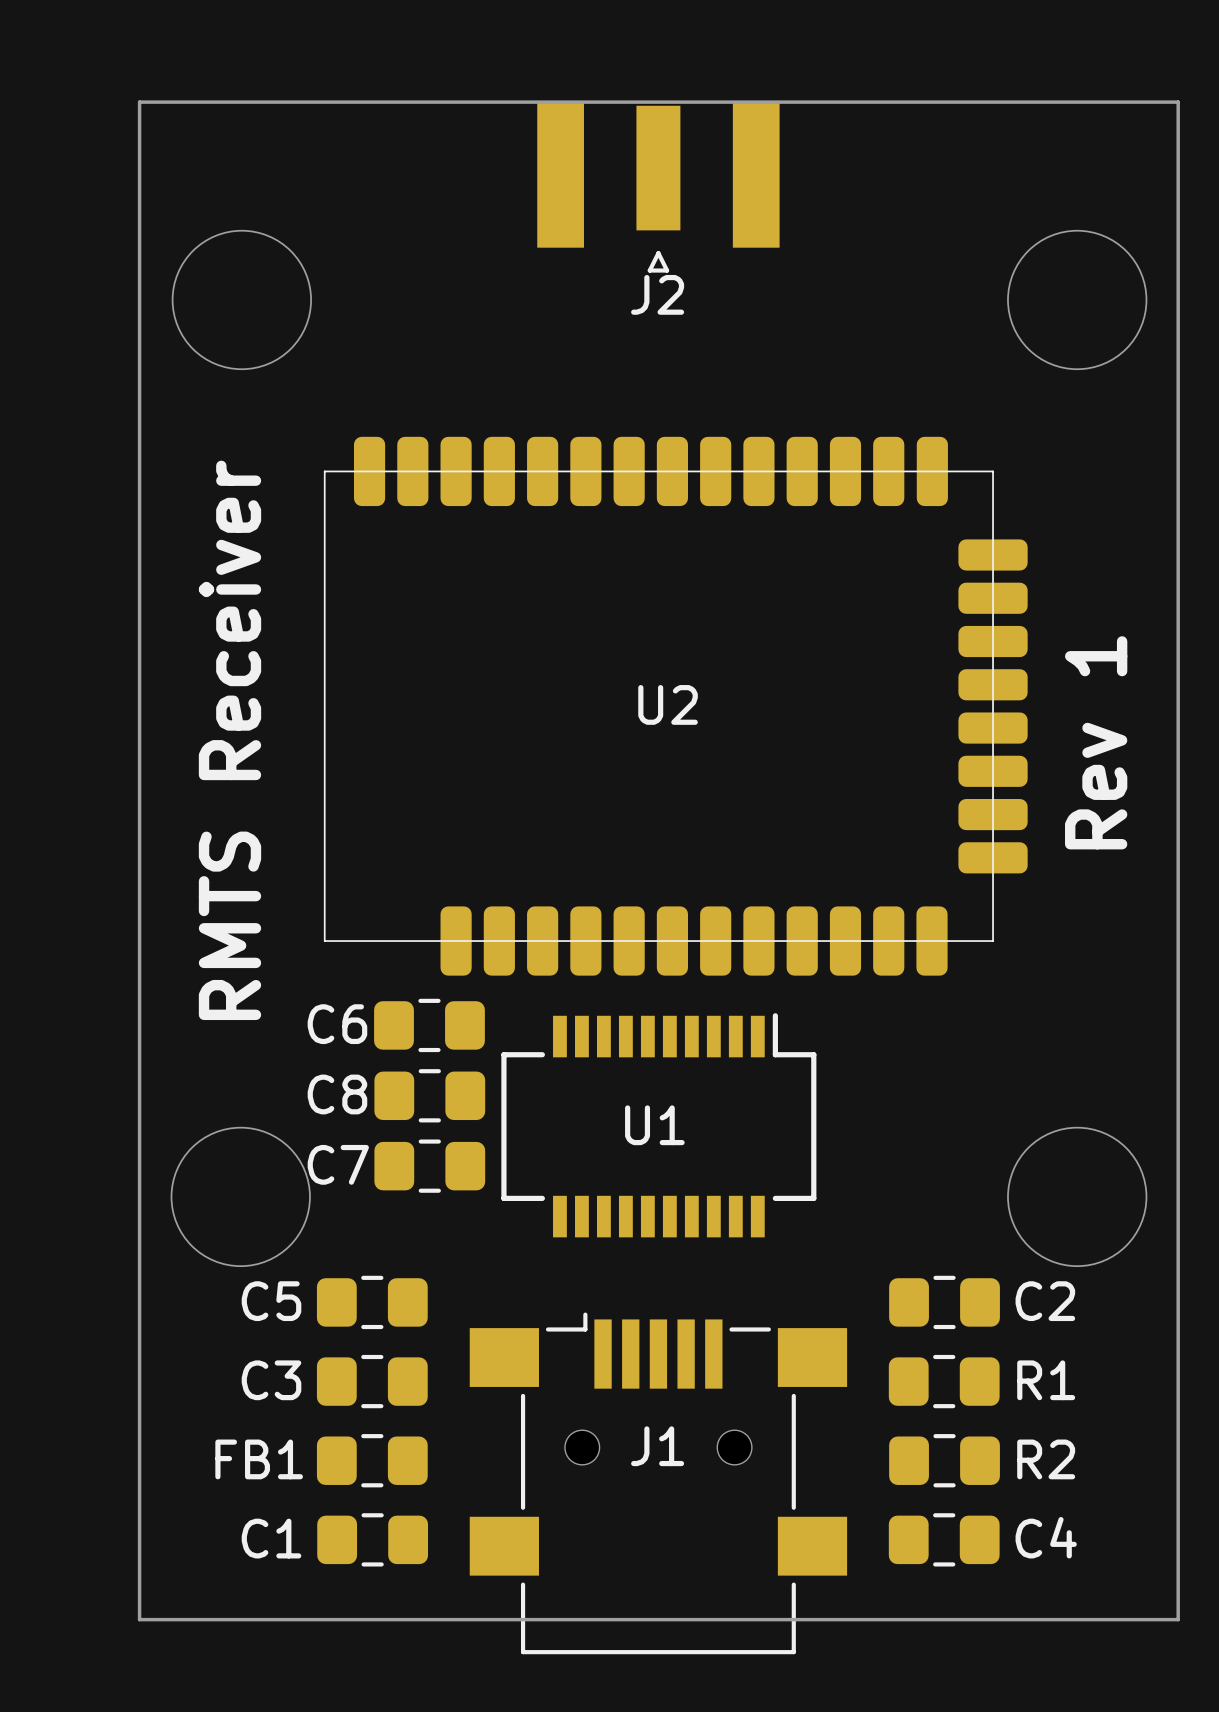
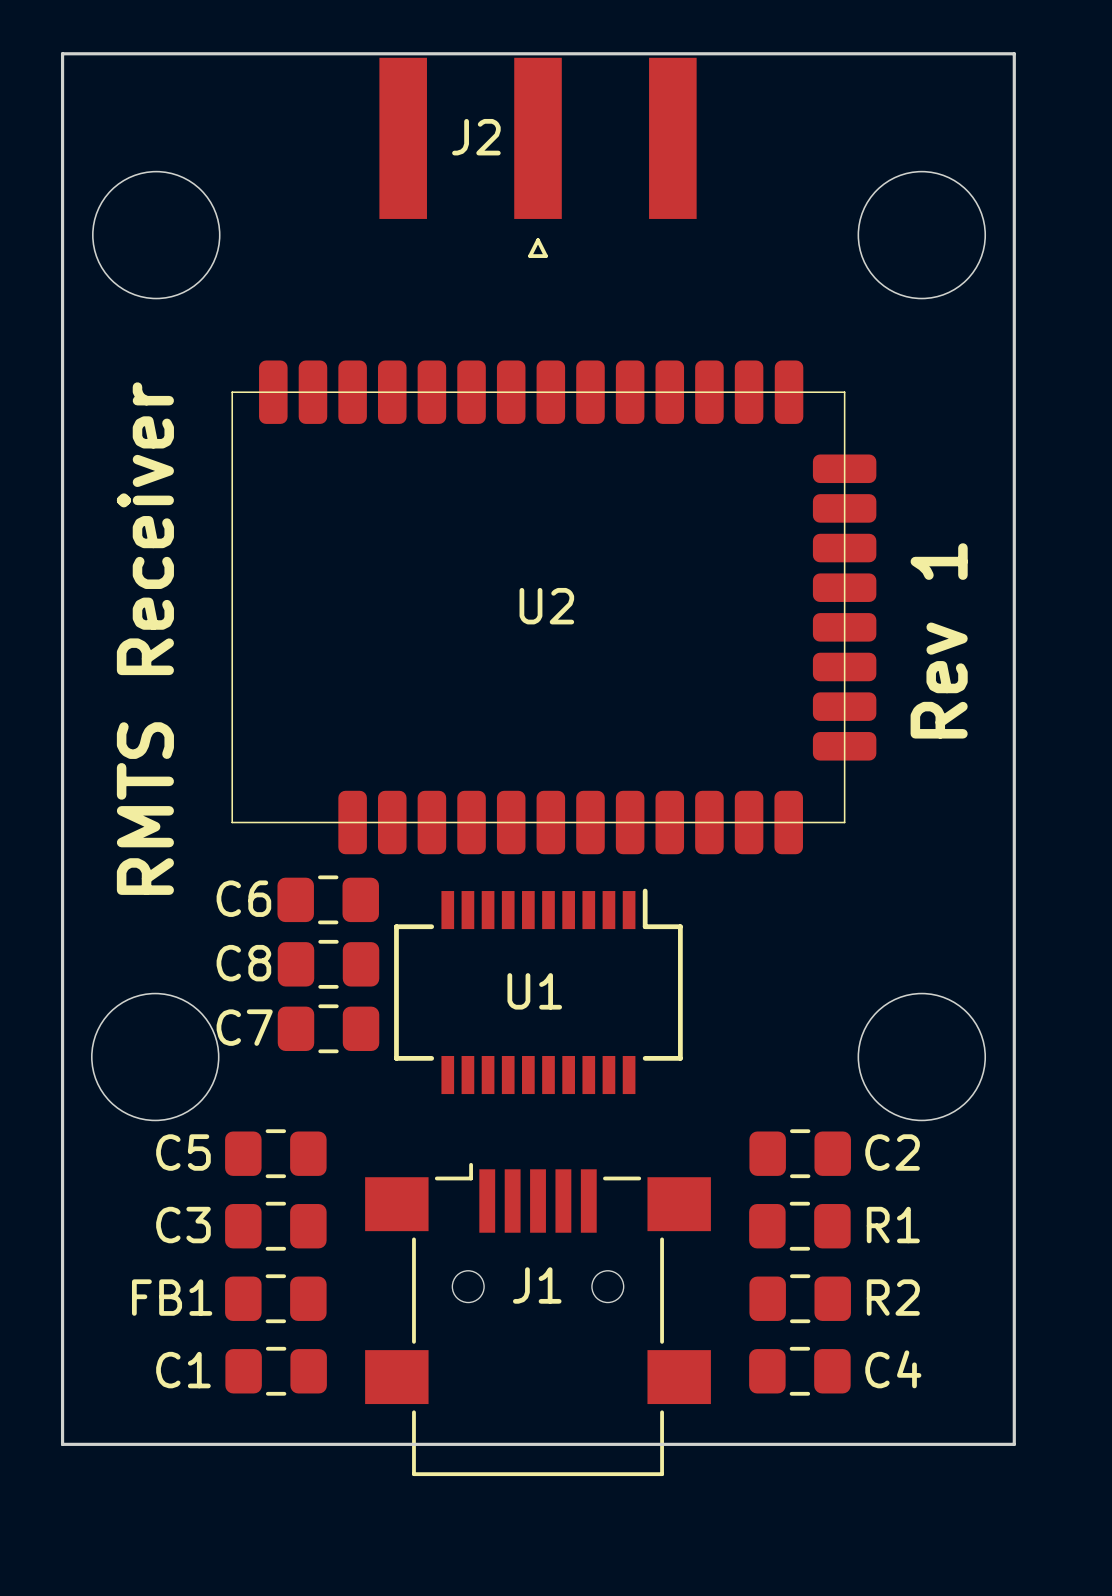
J2 footprint: [537, 102, 780, 273] -> [379, 57, 697, 258]
J2 name position: J2 (657, 294) -> J2 (476, 137)

